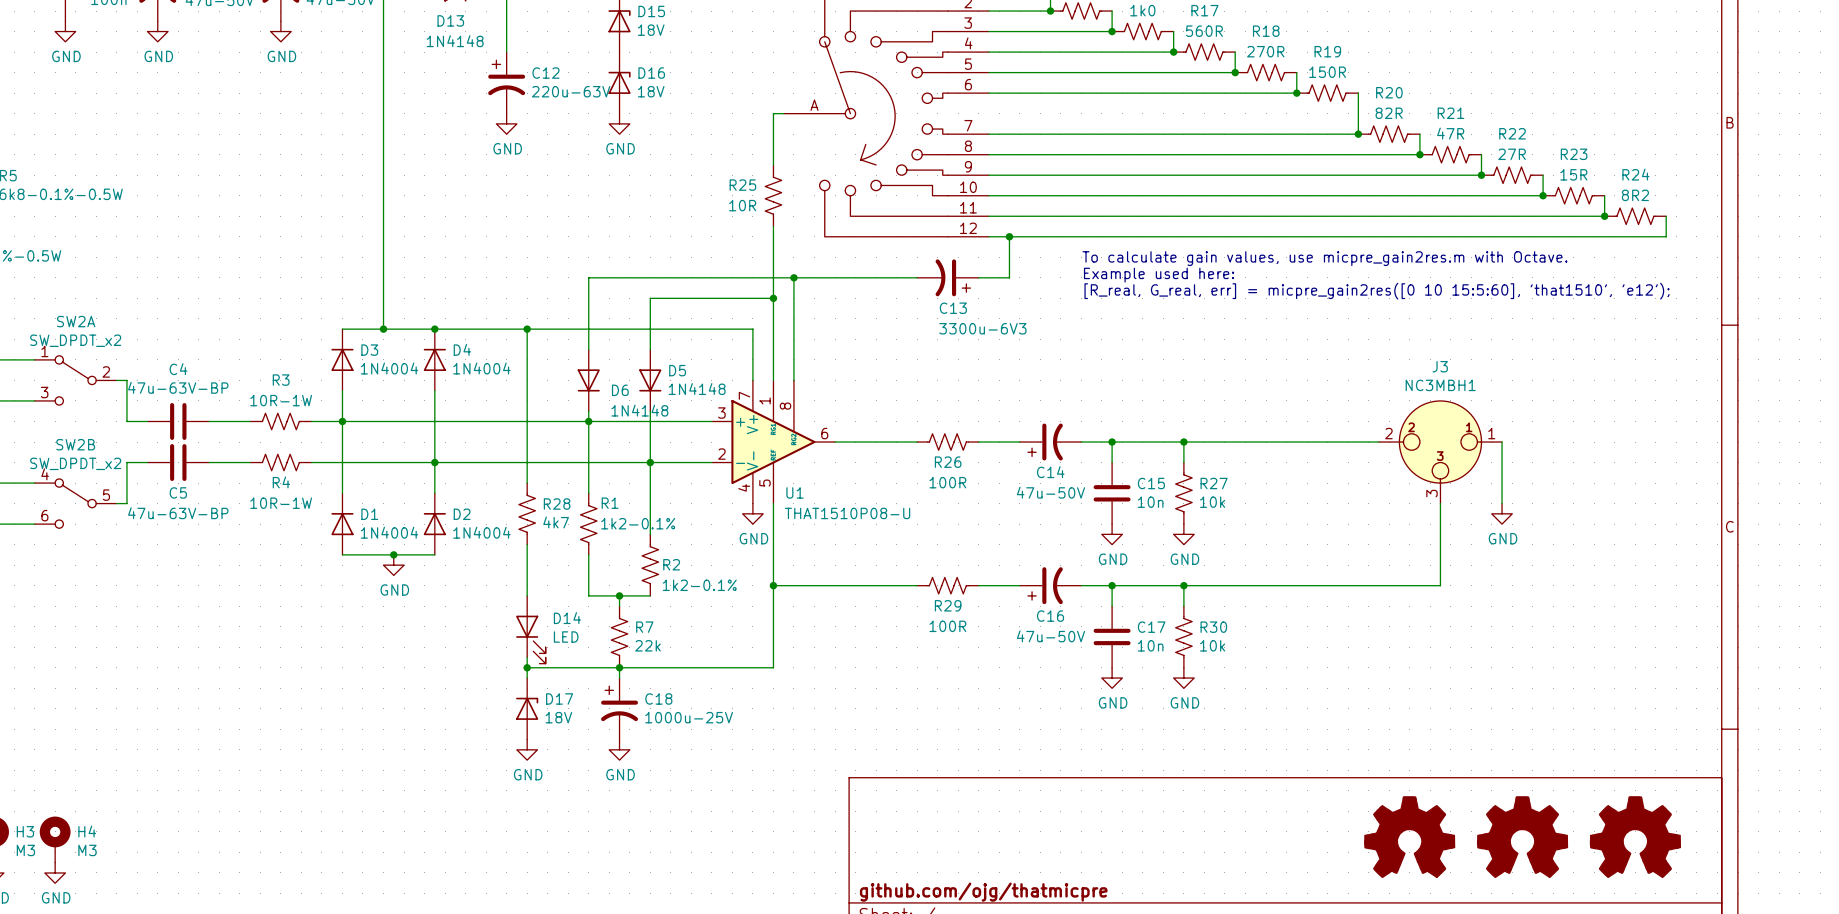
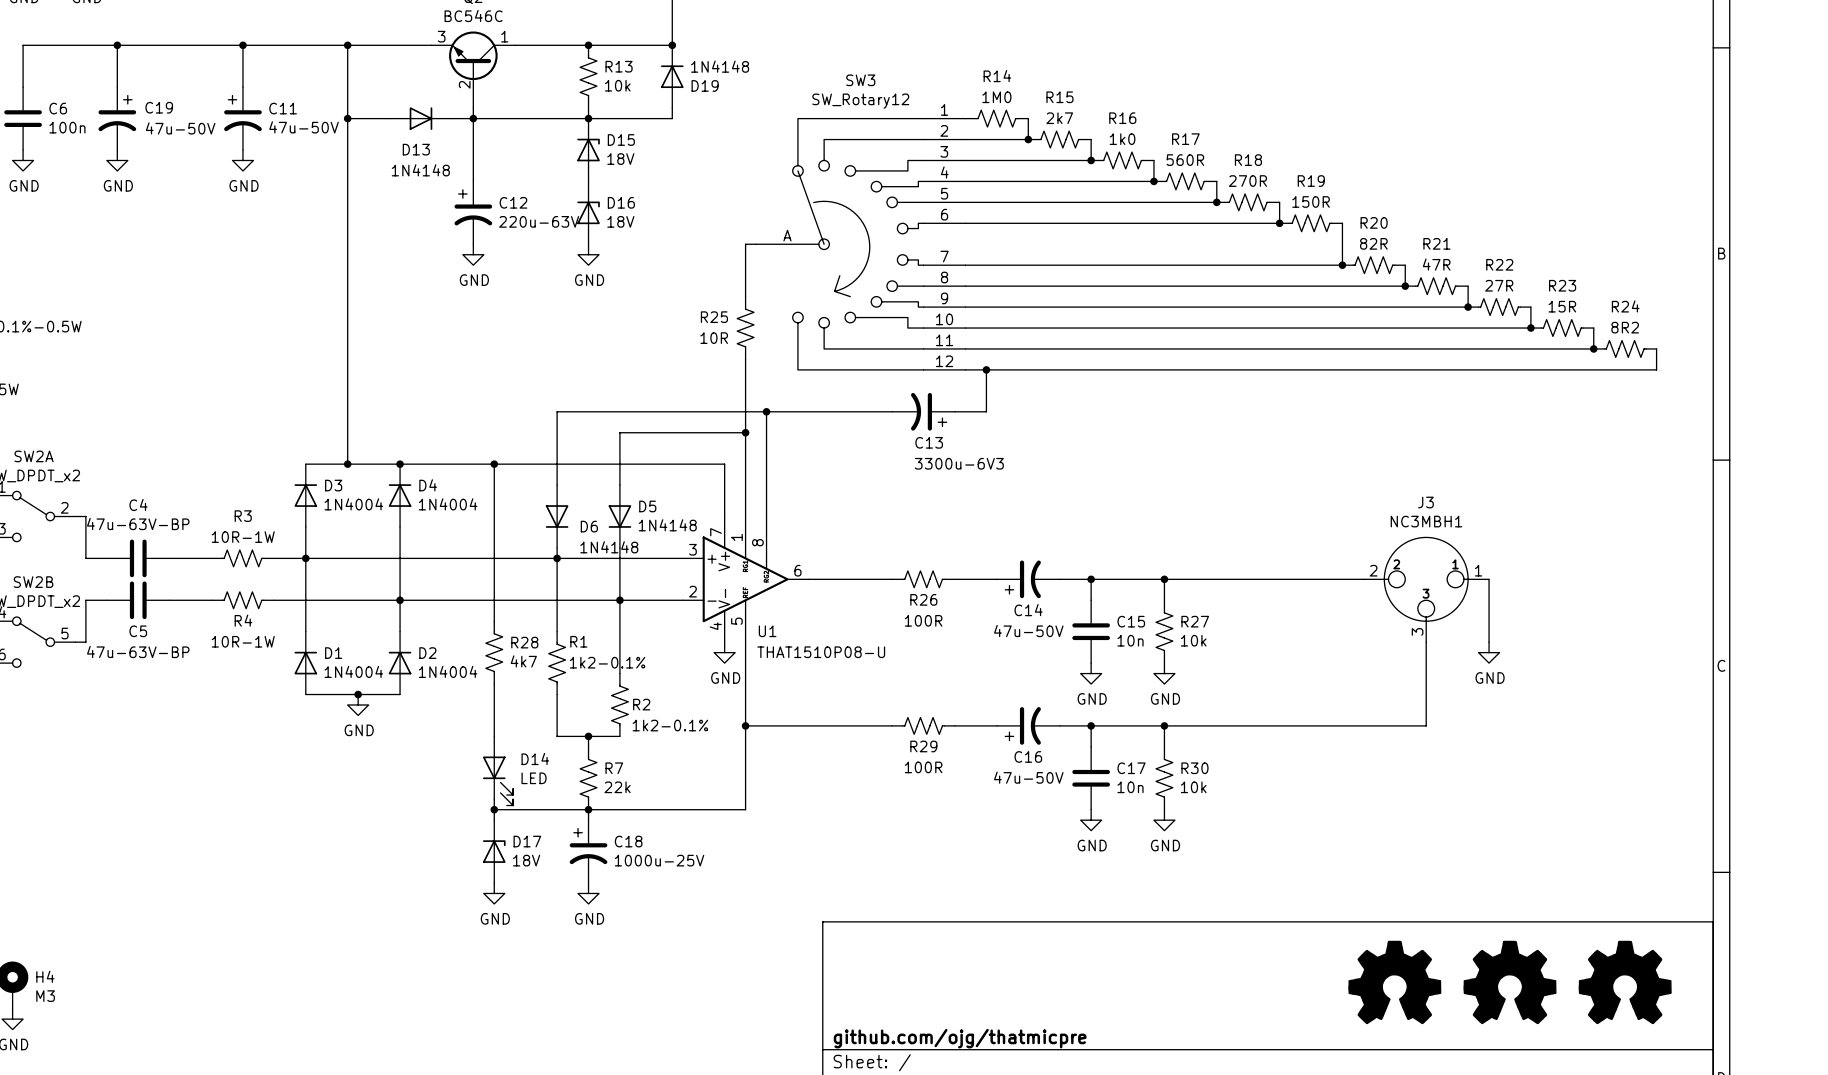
text: To calculate gain values, use micpre_gain2res.m with Octave. (1324, 258) -> none
text: Example used here: (1159, 275) -> none
text: [R_real, G_real, err] = micpre_gain2res([0 10 15:5:60], 'that1510', 'e12'); (1377, 291) -> none

